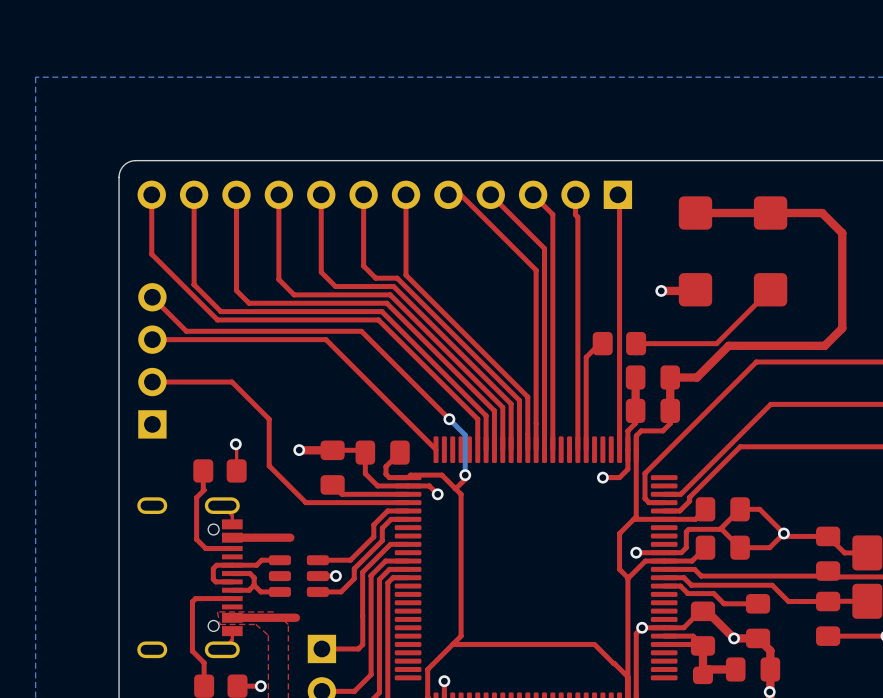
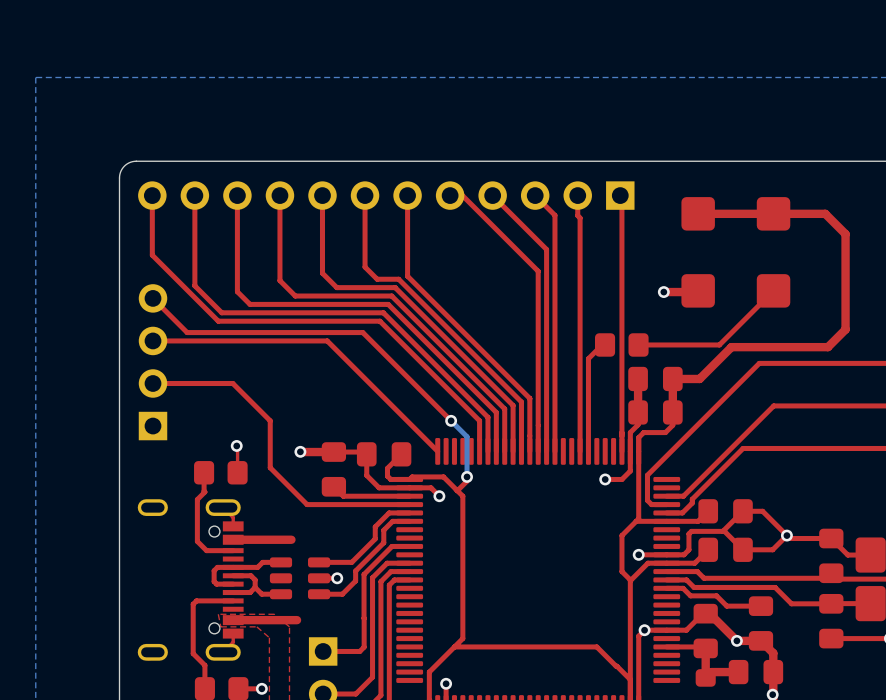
top track: (664, 636) (693, 636) (702, 645) -> none

